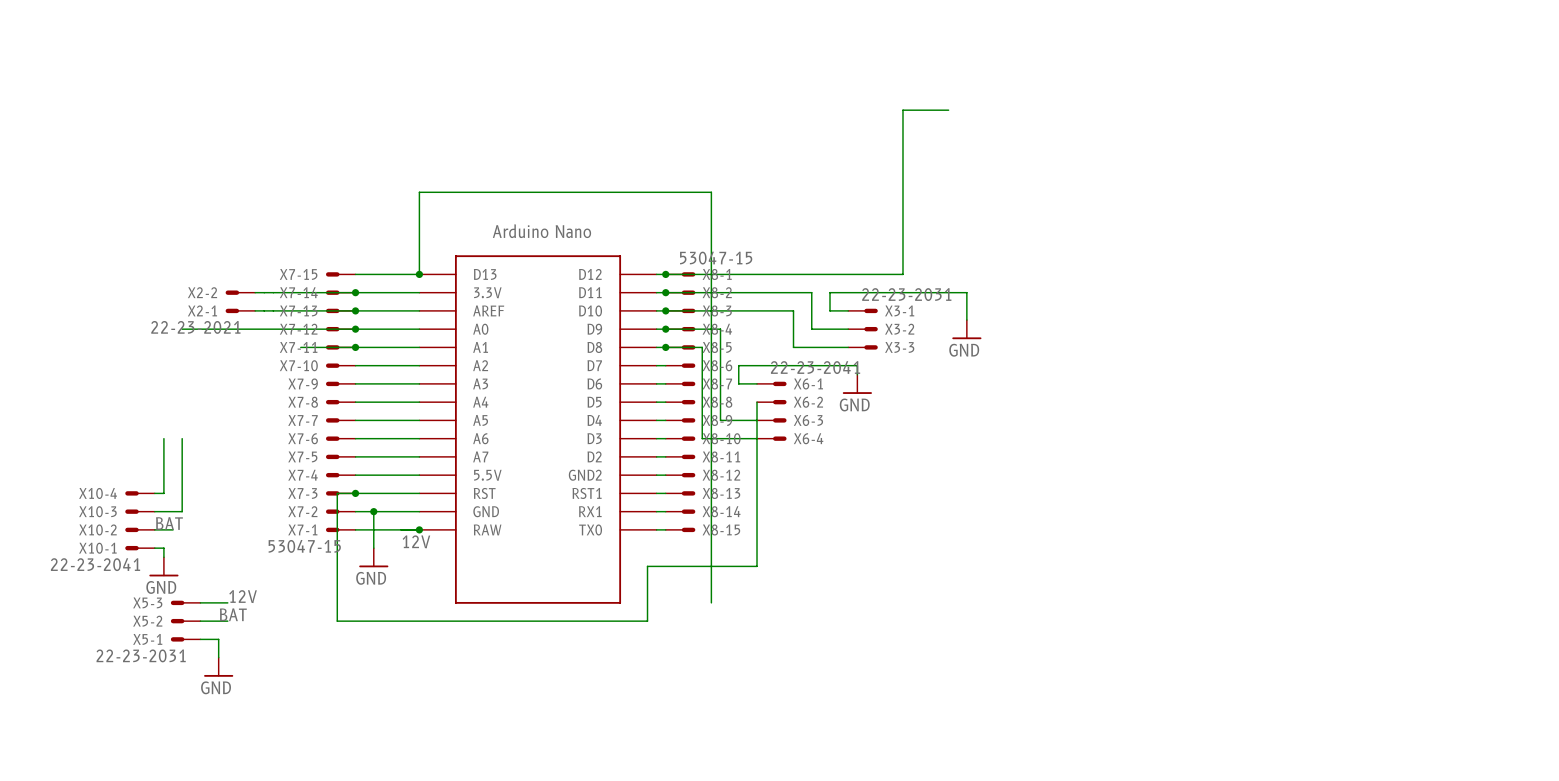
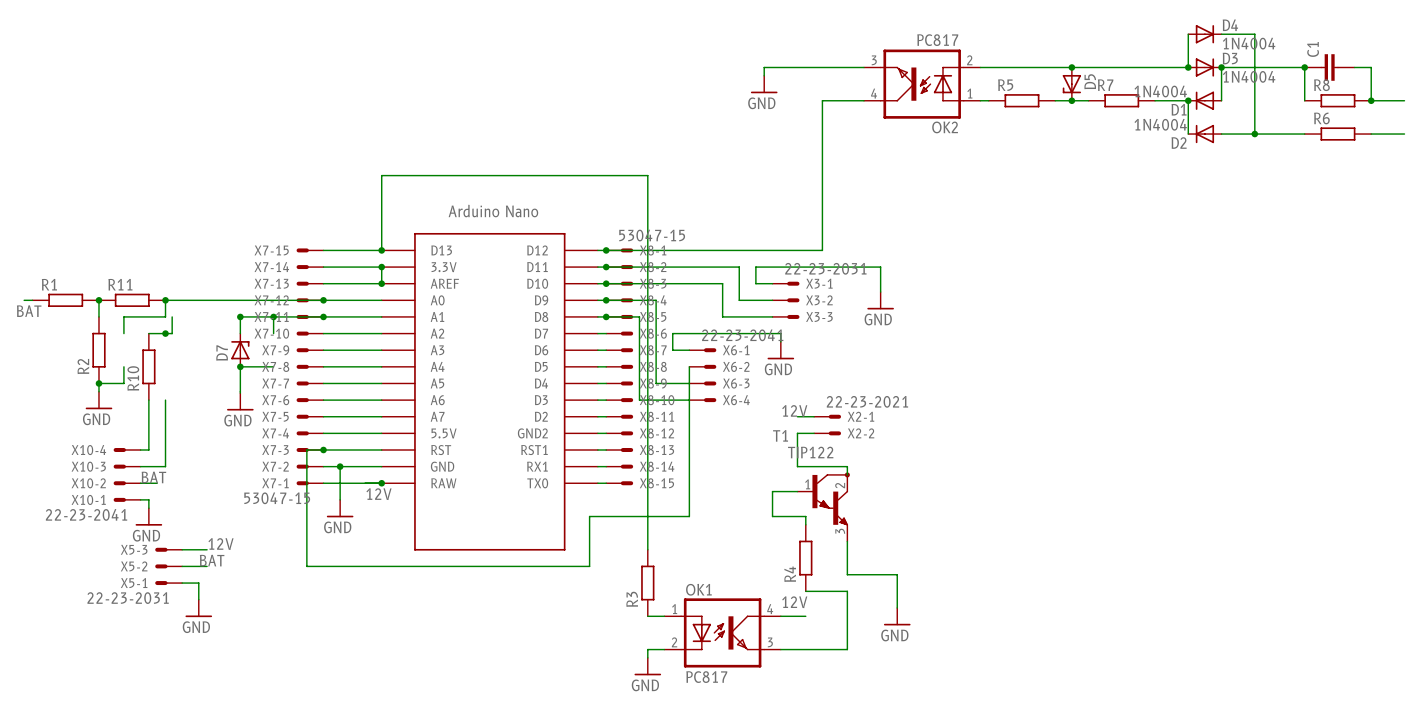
wire: none -> (1188, 34) (1188, 67) (980, 67)
D4: none -> 1N4004 (1204, 34)
wire: none -> (1221, 34) (1254, 34) (1254, 134)
wire: none -> (863, 67) (764, 67) (764, 75)
junction: none -> (1071, 67)
junction: none -> (1188, 67)
D3: none -> 1N4004 (1204, 67)
junction: none -> (1221, 67)
junction: none -> (1304, 67)
C1: none -> (1329, 67)
wire: none -> (1354, 67) (1371, 67) (1371, 100) (1404, 100)
OK2: none -> PC817 (922, 84)
D5: none -> (1071, 84)
power symbol: none -> GND (764, 84)
wire: none -> (980, 100) (988, 100)
R5: none -> (1021, 100)
wire: none -> (1055, 100) (1088, 100)
junction: none -> (1071, 100)
R7: none -> (1121, 100)
wire: none -> (1155, 100) (1188, 100) (1188, 134)
junction: none -> (1188, 100)
D1: none -> 1N4004 (1204, 100)
wire: none -> (1221, 100) (1221, 67) (1304, 67) (1304, 100)
R8: none -> (1337, 100)
junction: none -> (1371, 100)
D2: none -> 1N4004 (1204, 134)
wire: none -> (1221, 134) (1304, 134)
junction: none -> (1254, 134)
R6: none -> (1337, 134)
wire: none -> (1371, 134) (1404, 134)
X2-2 rotation: 0° (232, 292) -> 180° (834, 433)
X2-2 position: (240, 292) -> (827, 433)
wire: (255, 292) (355, 292) -> none
junction: (355, 292) -> none
wire: none -> (381, 267) (381, 283)
junction: none -> (381, 267)
X2-1 rotation: 0° (232, 310) -> 180° (834, 416)
X2-1 position: (240, 310) -> (827, 416)
wire: (255, 310) (355, 310) -> none
junction: (355, 310) -> none
junction: none -> (381, 283)
wire: none -> (24, 300) (32, 300)
R1: none -> (65, 300)
wire: none -> (98, 300) (98, 316)
junction: none -> (98, 300)
R11: none -> (132, 300)
wire: none -> (165, 300) (165, 316) (123, 316) (123, 333)
junction: none -> (165, 300)
label: none -> BAT (29, 311)
wire: none -> (172, 316) (172, 333) (148, 333)
wire: none -> (238, 316) (273, 316) (273, 333)
wire: none -> (240, 316) (240, 333)
junction: none -> (240, 316)
junction: none -> (273, 316)
junction: none -> (165, 333)
R2: none -> (98, 350)
D7: none -> (240, 350)
wire: none -> (123, 366) (123, 383) (98, 383) (98, 391)
R10: none -> (148, 366)
junction: none -> (240, 366)
wire: none -> (273, 366) (240, 366) (240, 393)
junction: none -> (98, 383)
power symbol: none -> GND (98, 400)
power symbol: none -> GND (240, 401)
label: none -> 12V (794, 410)
wire: none -> (797, 416) (814, 416)
wire: none -> (814, 433) (797, 433) (797, 466) (847, 466) (847, 474)
wire: none -> (797, 491) (772, 491) (772, 516) (805, 516) (805, 524)
T1: none -> TIP122 (823, 506)
wire: none -> (847, 541) (847, 574) (897, 574) (897, 607)
R4: none -> (805, 558)
R3: none -> (647, 583)
wire: none -> (805, 591) (847, 591) (847, 649) (780, 649)
label: none -> 12V (794, 602)
wire: none -> (647, 616) (664, 616)
wire: none -> (780, 616) (805, 616)
power symbol: none -> GND (897, 616)
OK1: none -> PC817 (722, 632)
wire: none -> (664, 649) (647, 649) (647, 657)
power symbol: none -> GND (647, 666)

